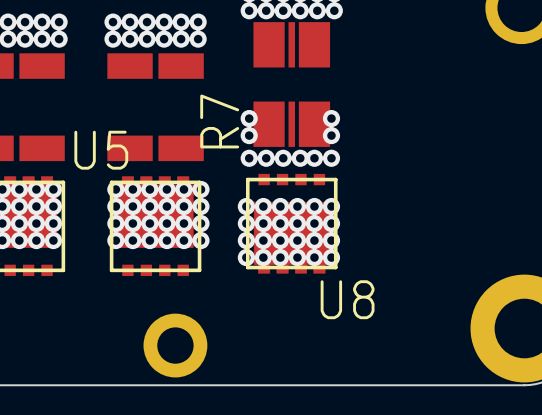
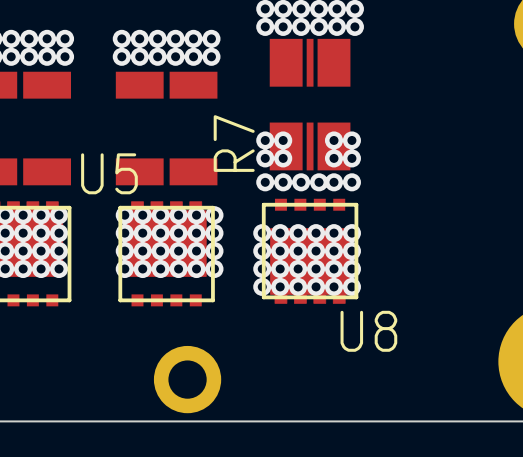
via: none -> (283, 140)
via: none -> (334, 140)
via: none -> (283, 158)
via: none -> (334, 158)

